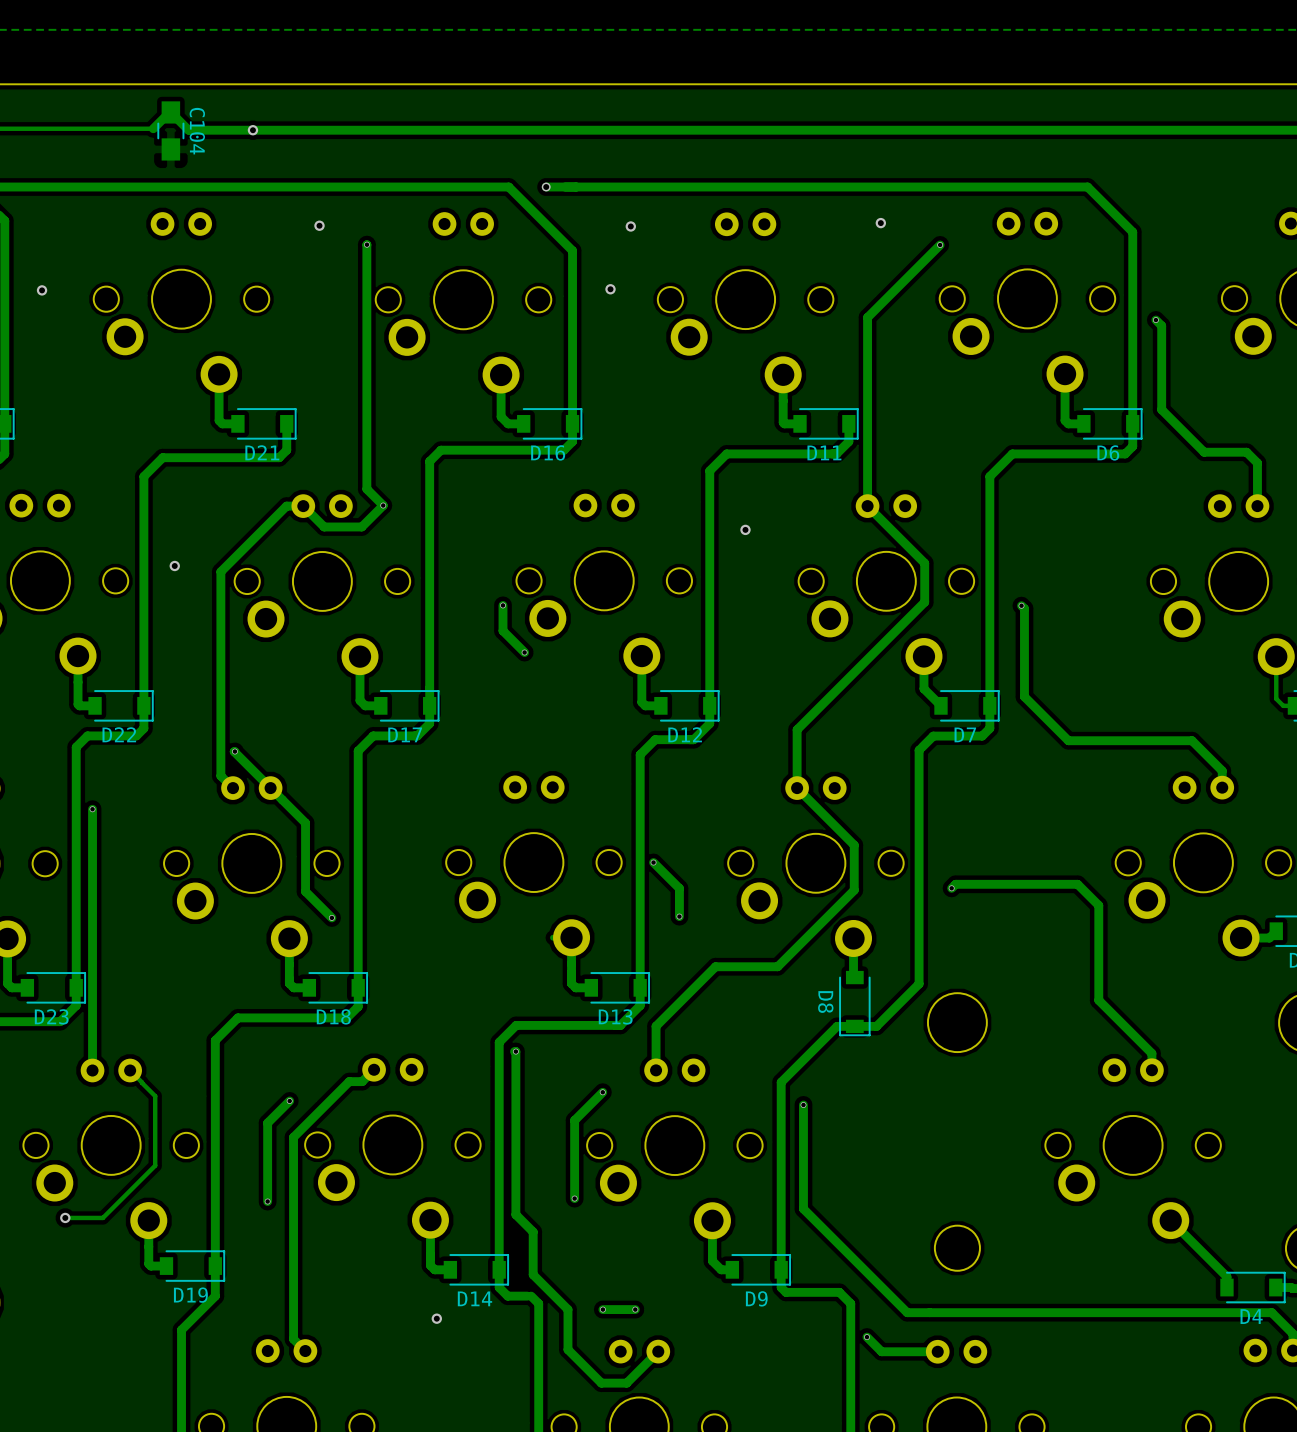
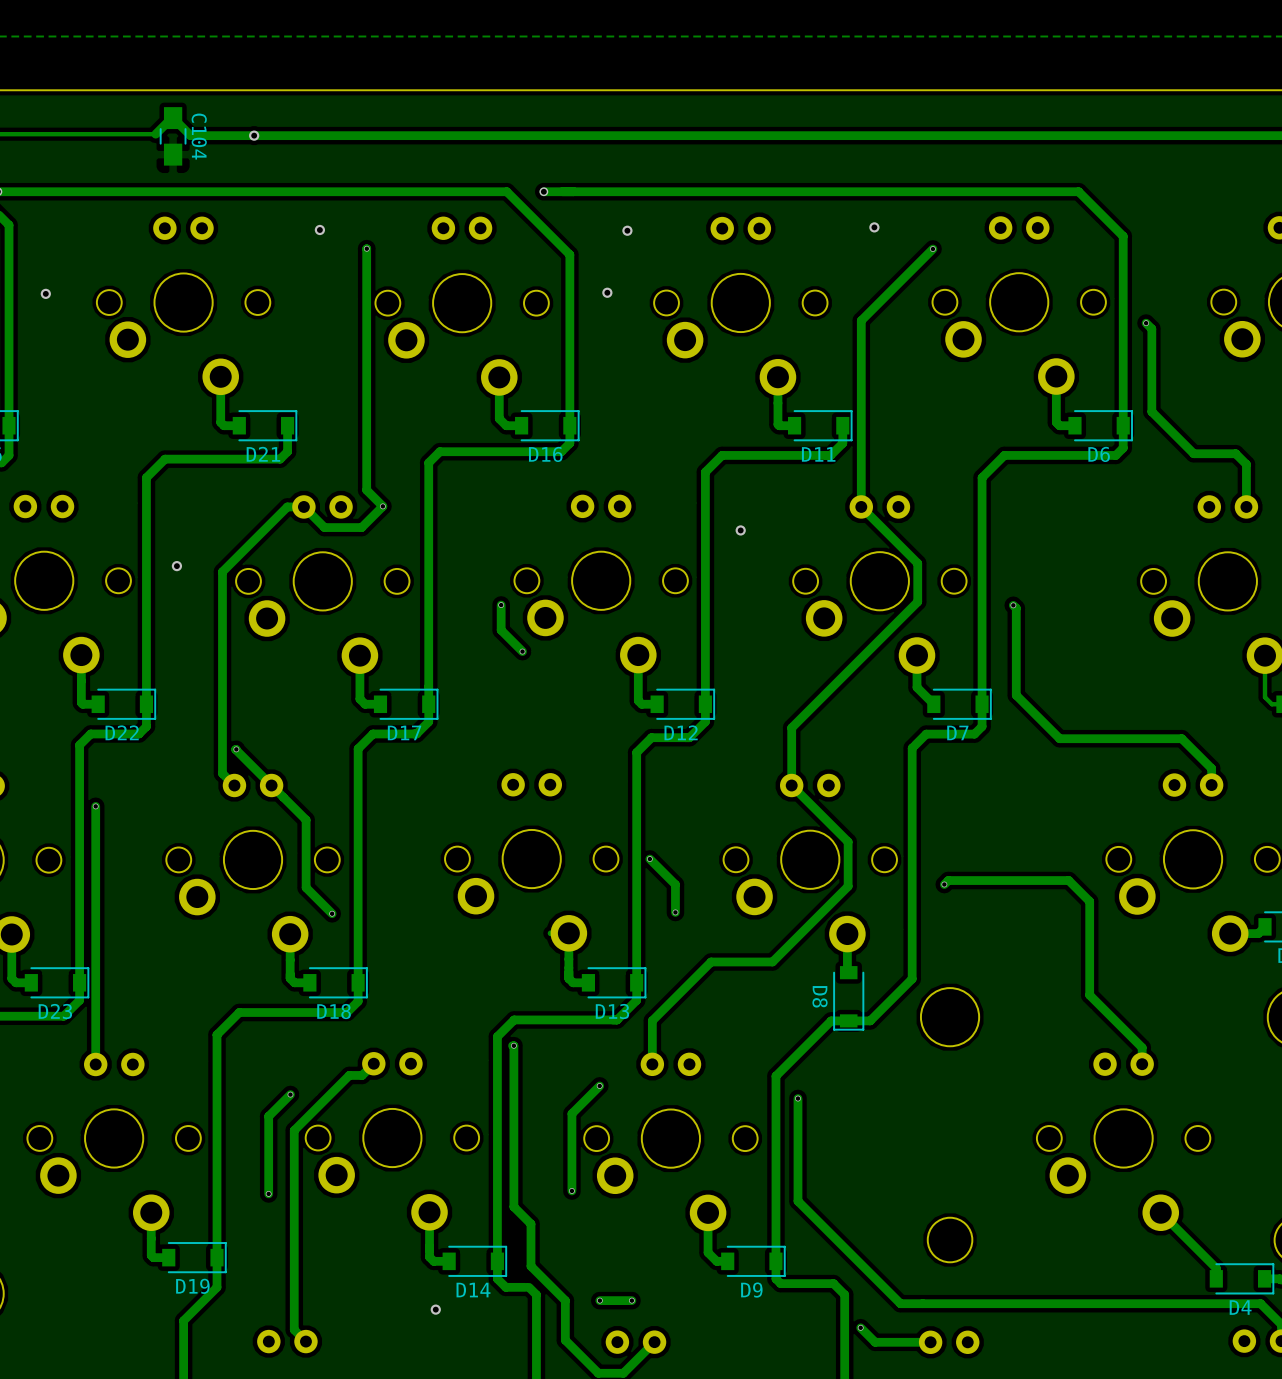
track: (130, 1070) (155, 1096) (155, 1165) (102, 1217) (65, 1217) -> none
via: (65, 1217) -> none

